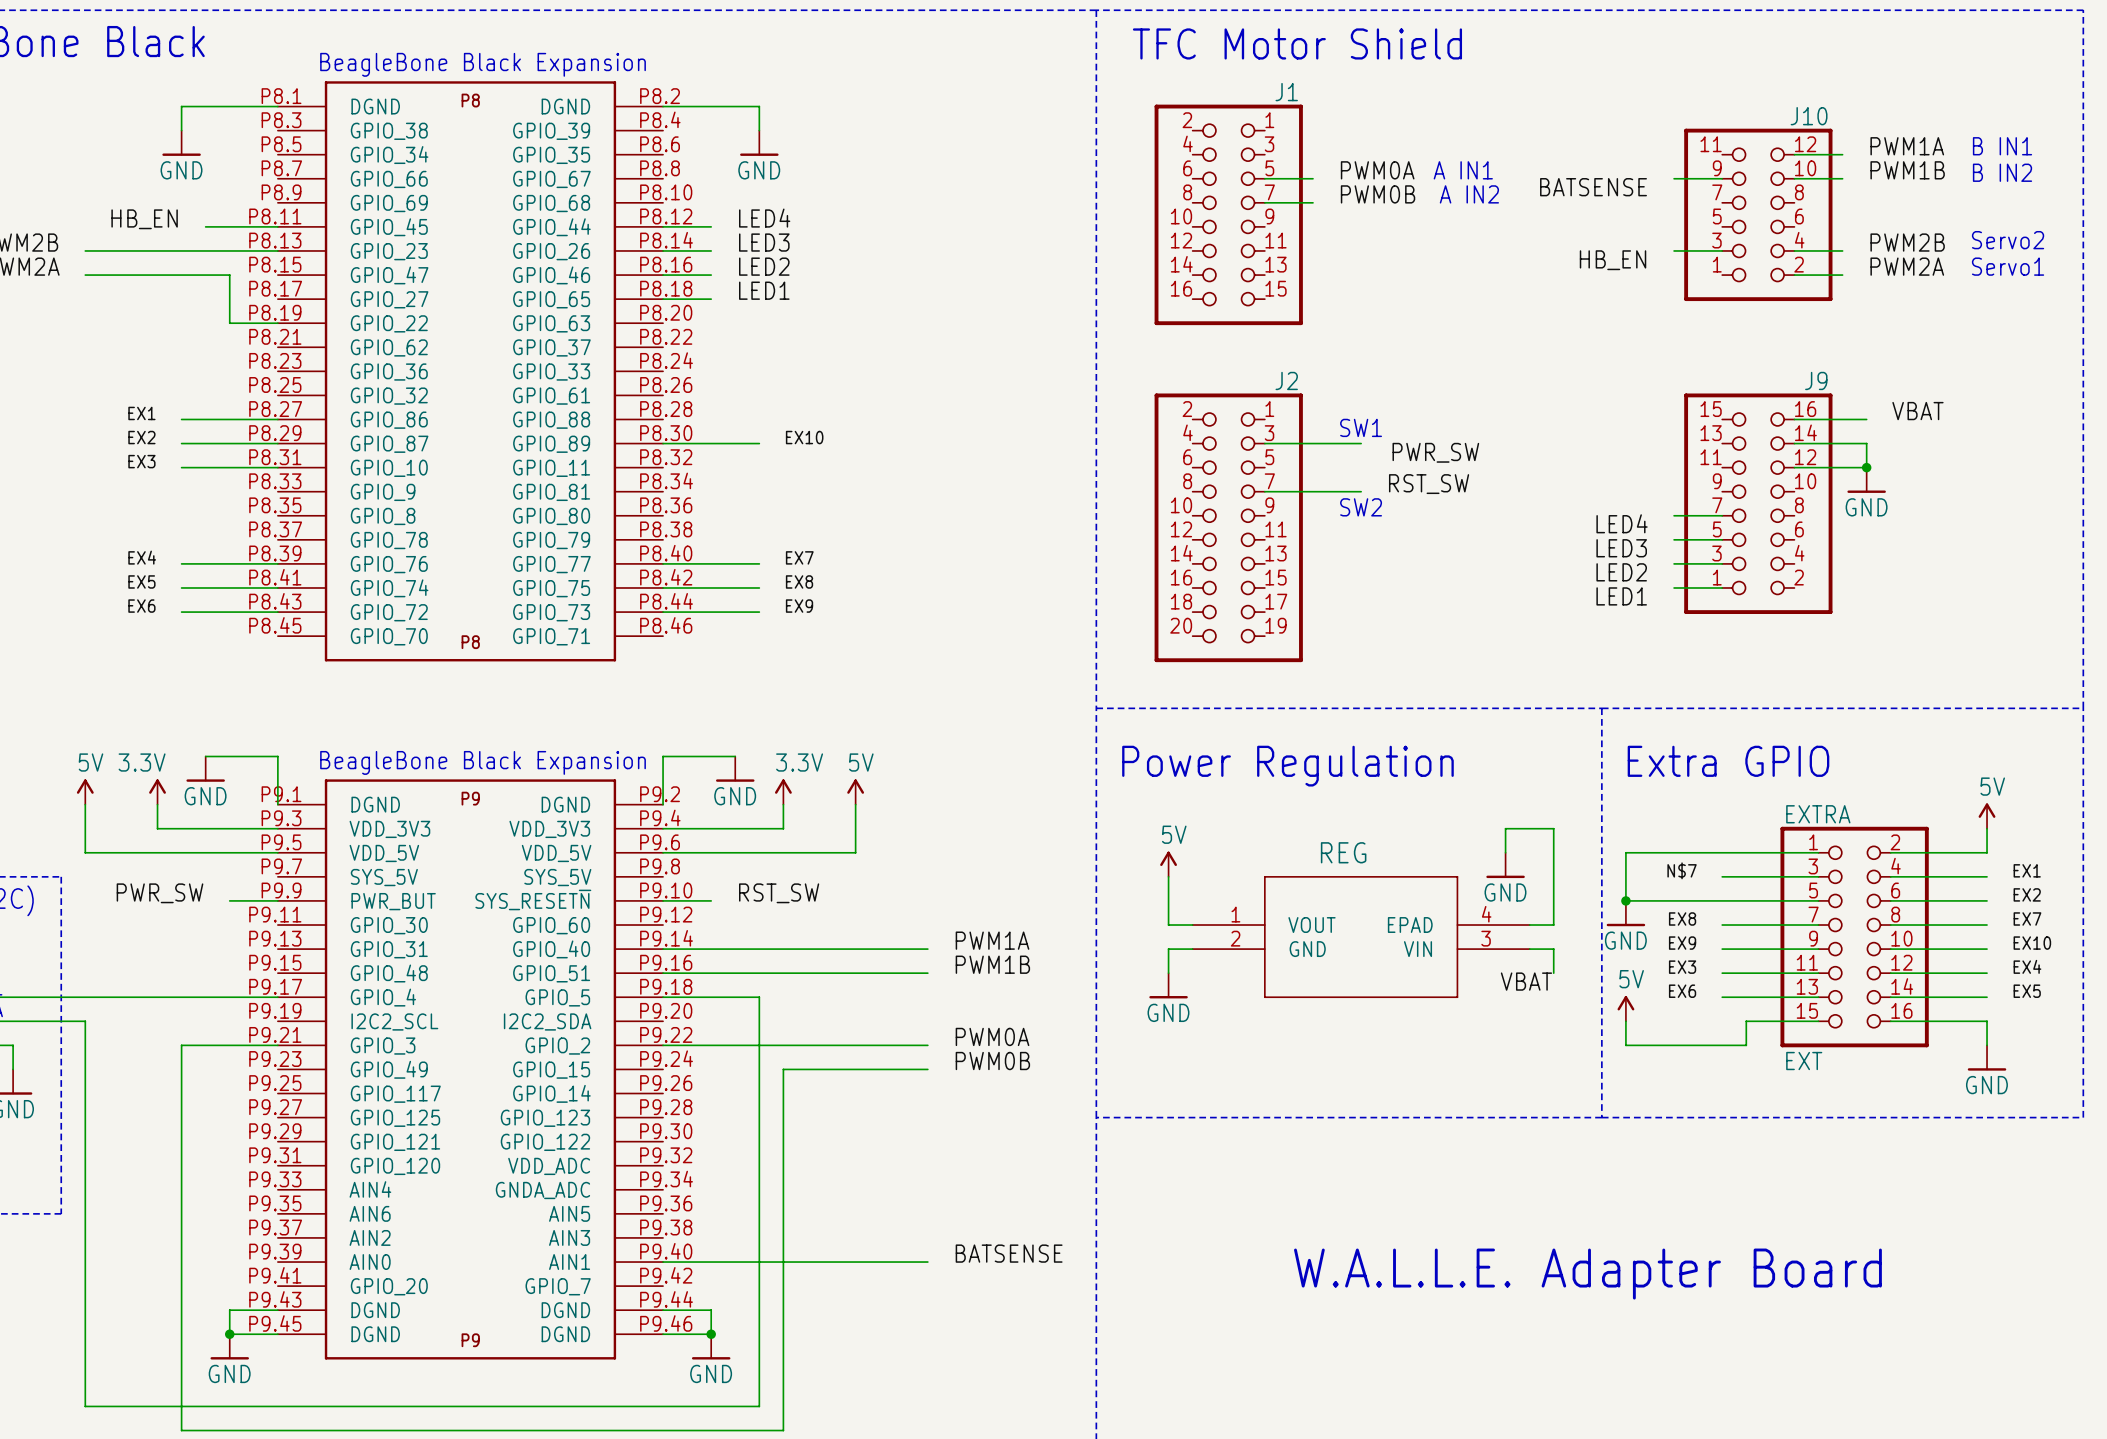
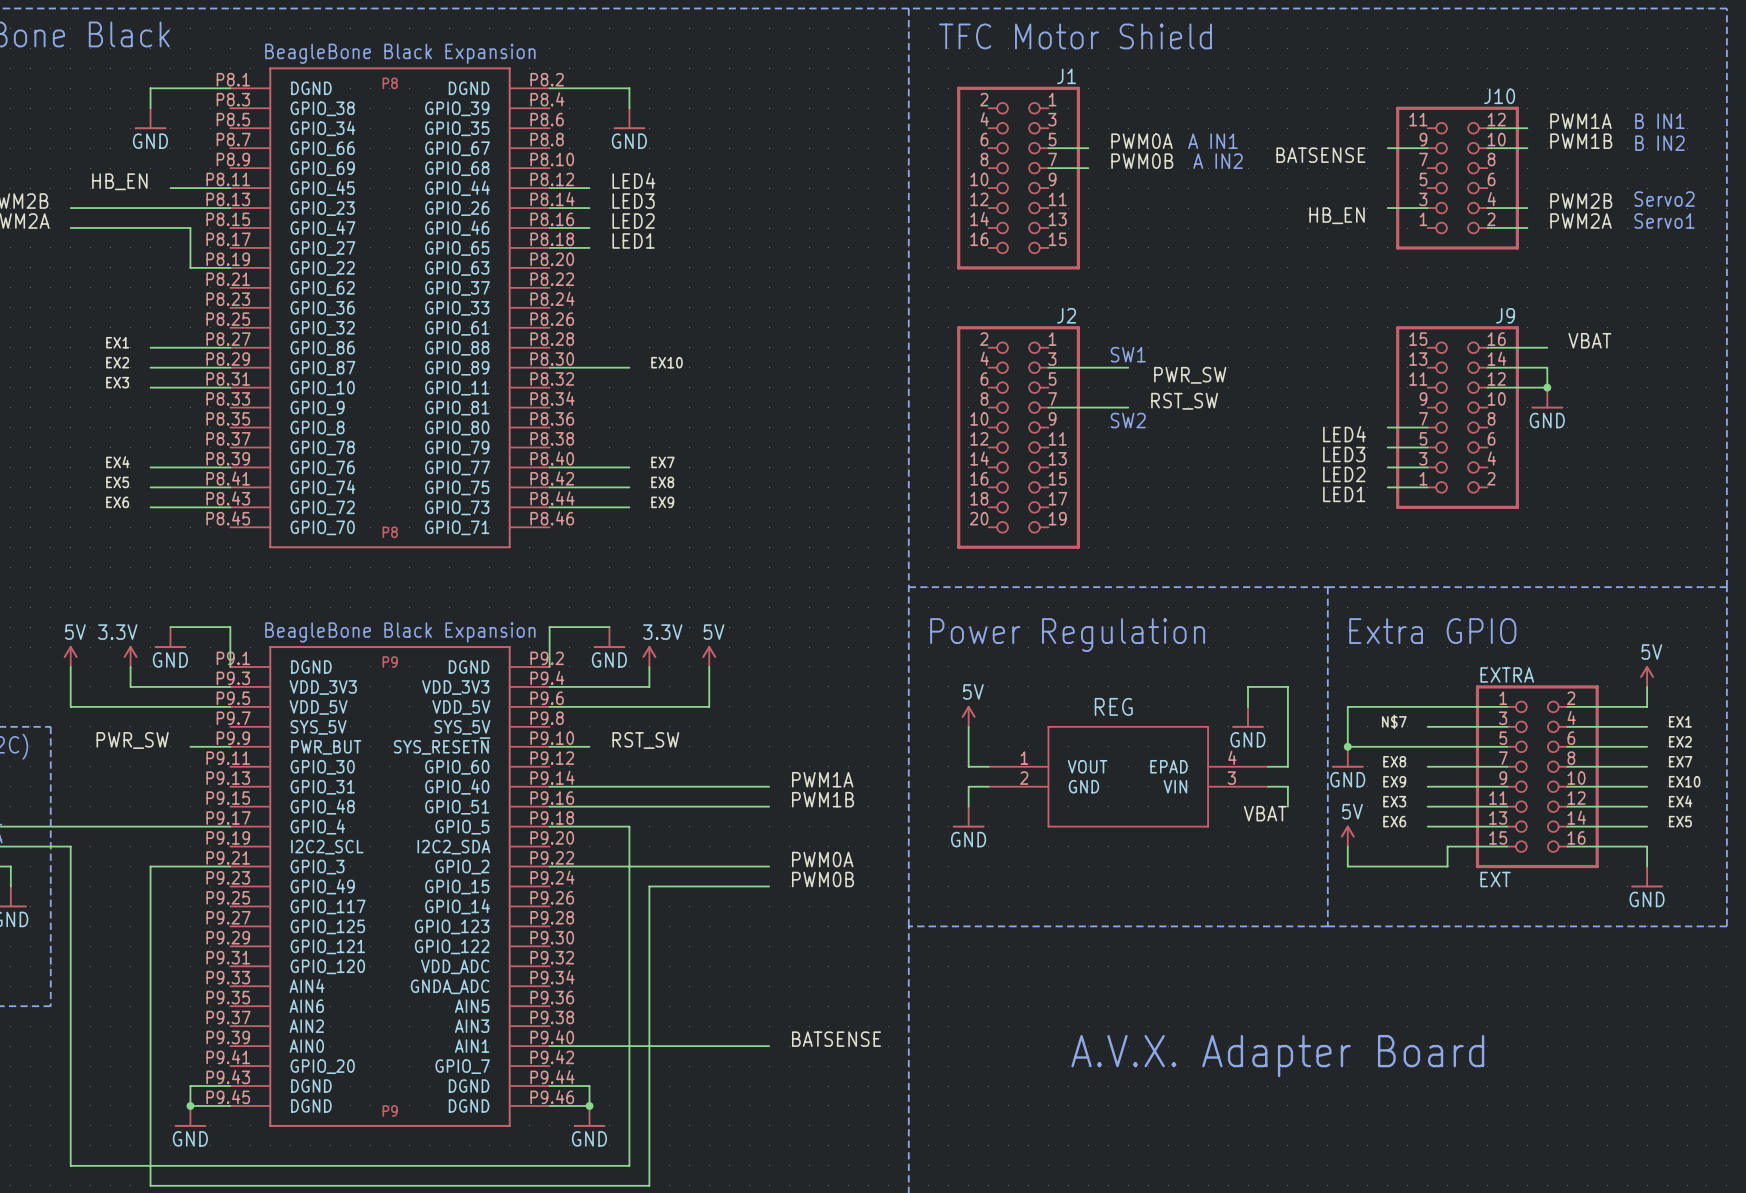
text: W.A.L.L.E. Adapter Board (1587, 1274) -> A.V.X. Adapter Board (1277, 1056)

